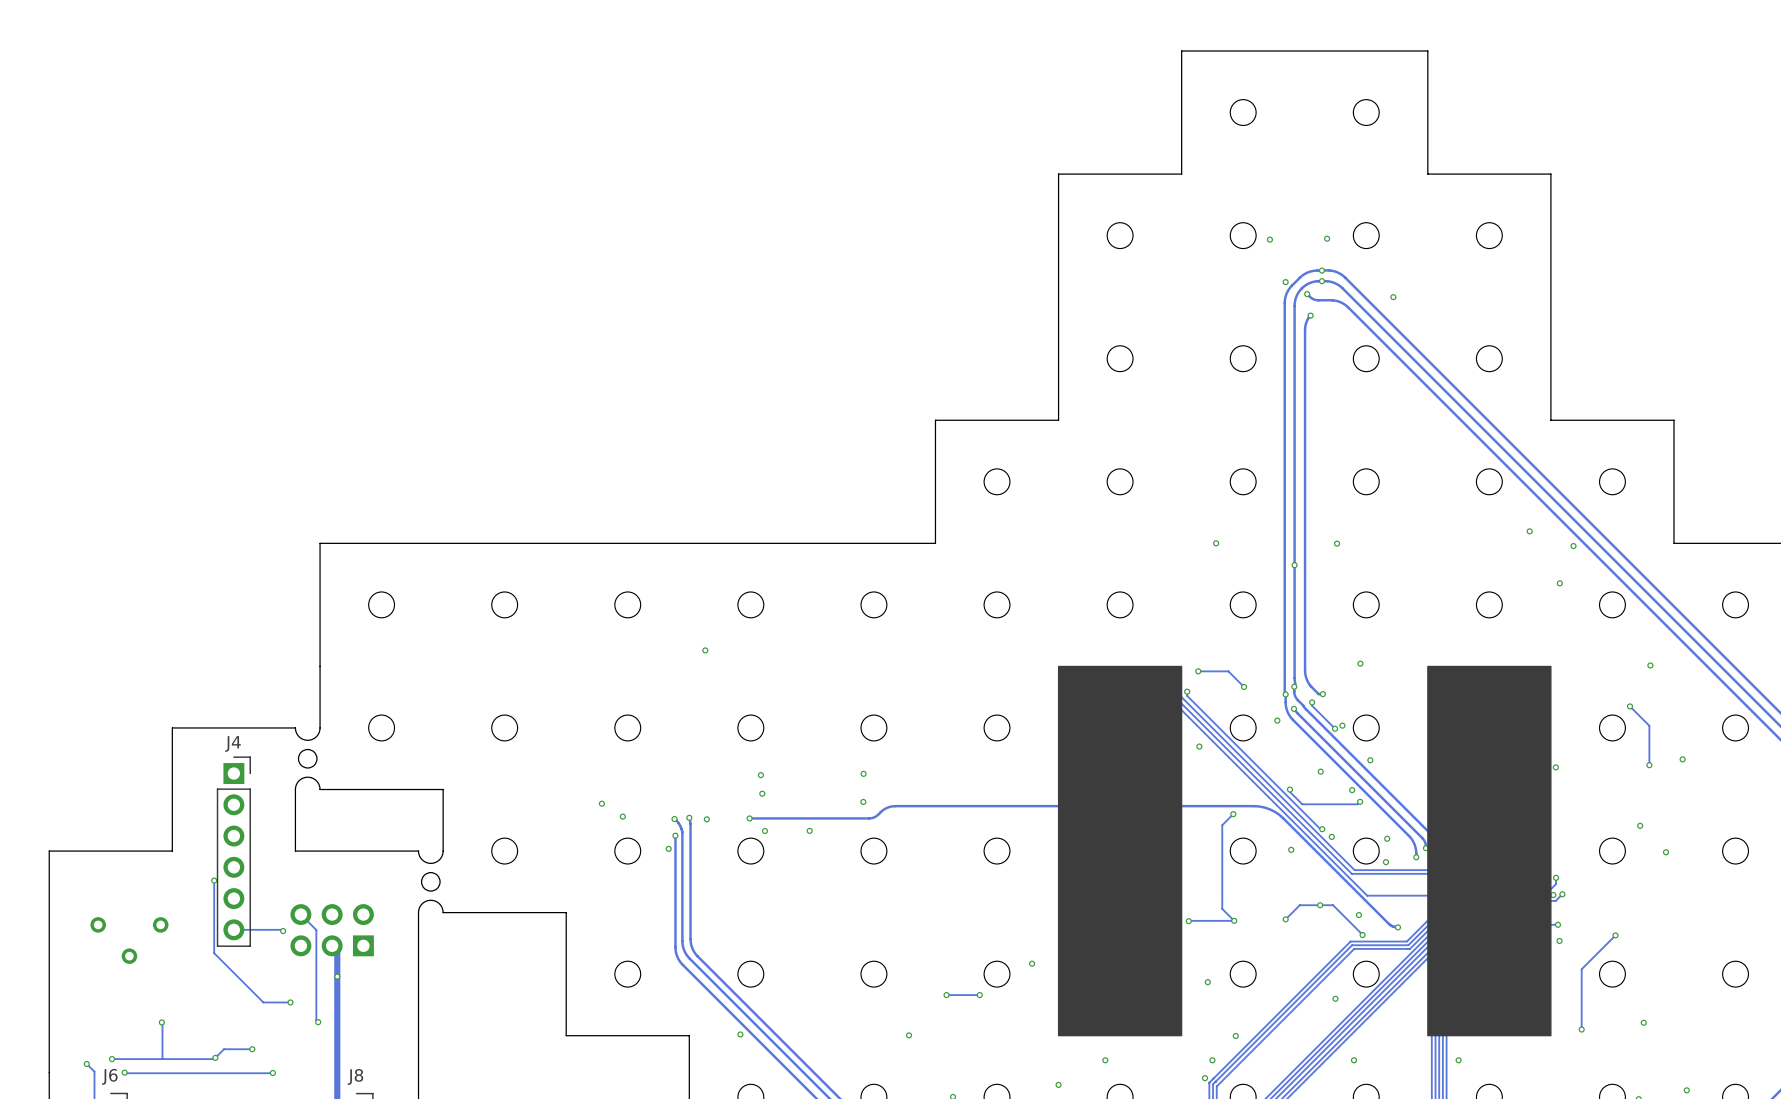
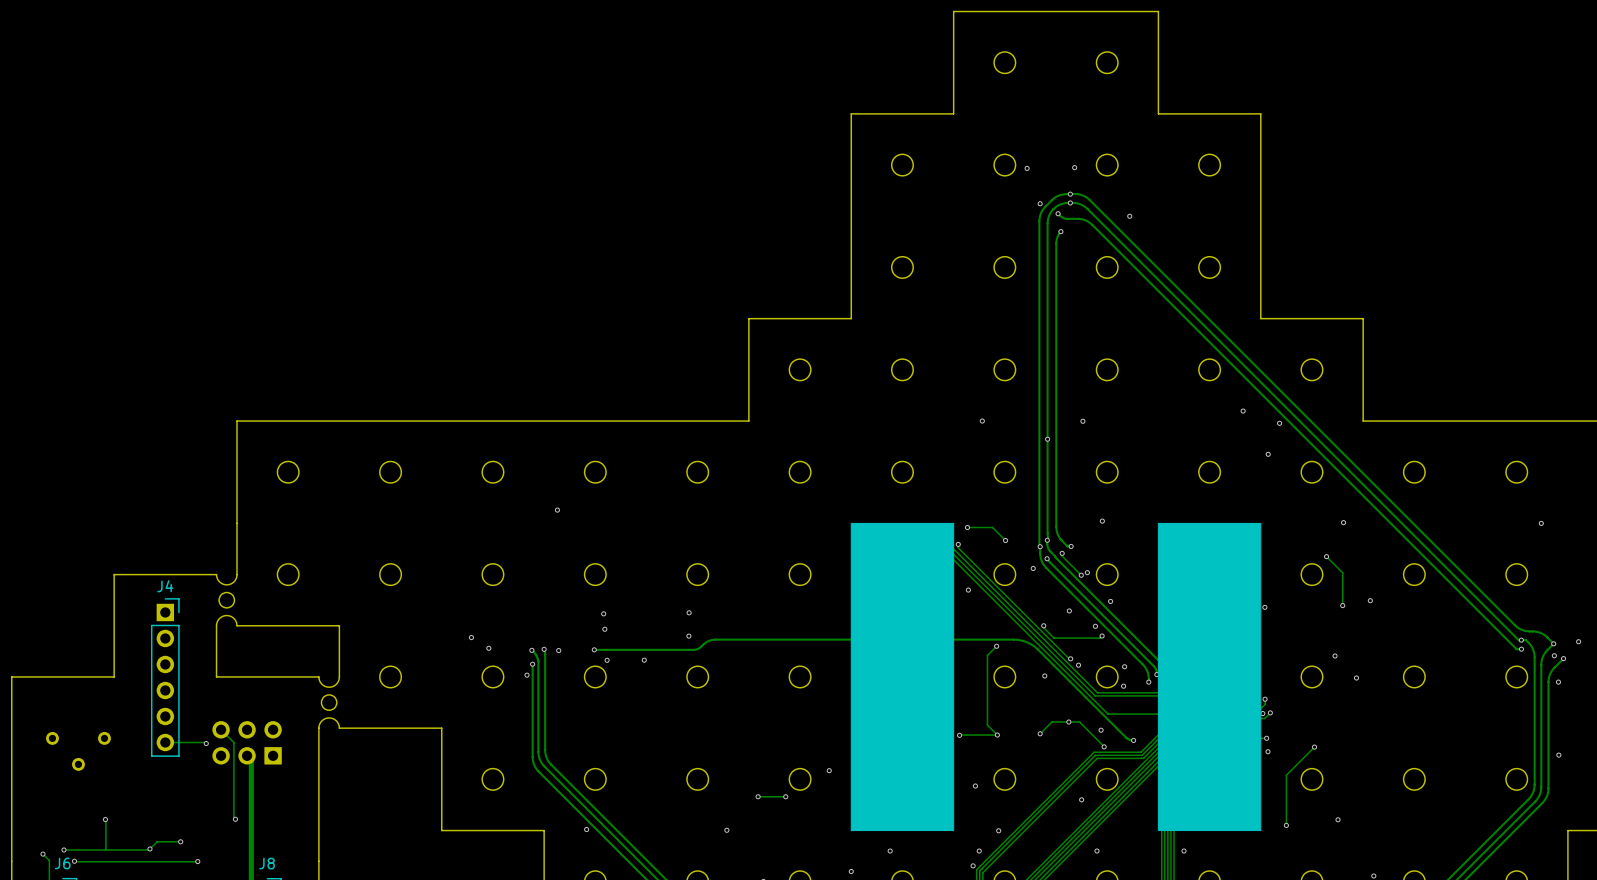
track: (214, 880) (214, 953) (263, 1002) (290, 1002) -> none
via: (214, 880) -> none
via: (337, 976) -> none
via: (290, 1002) -> none

